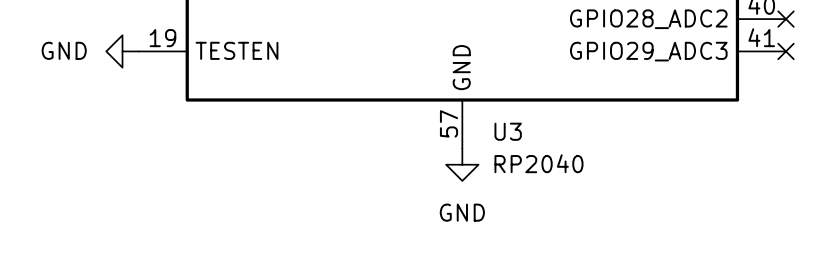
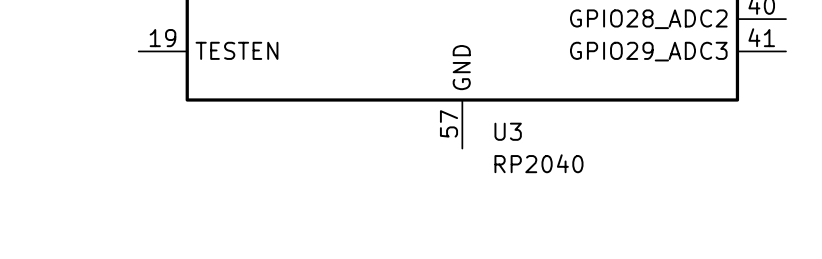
no-connect mark: (786, 19) -> none
power symbol: GND (122, 51) -> none
no-connect mark: (786, 51) -> none
power symbol: GND (462, 164) -> none

